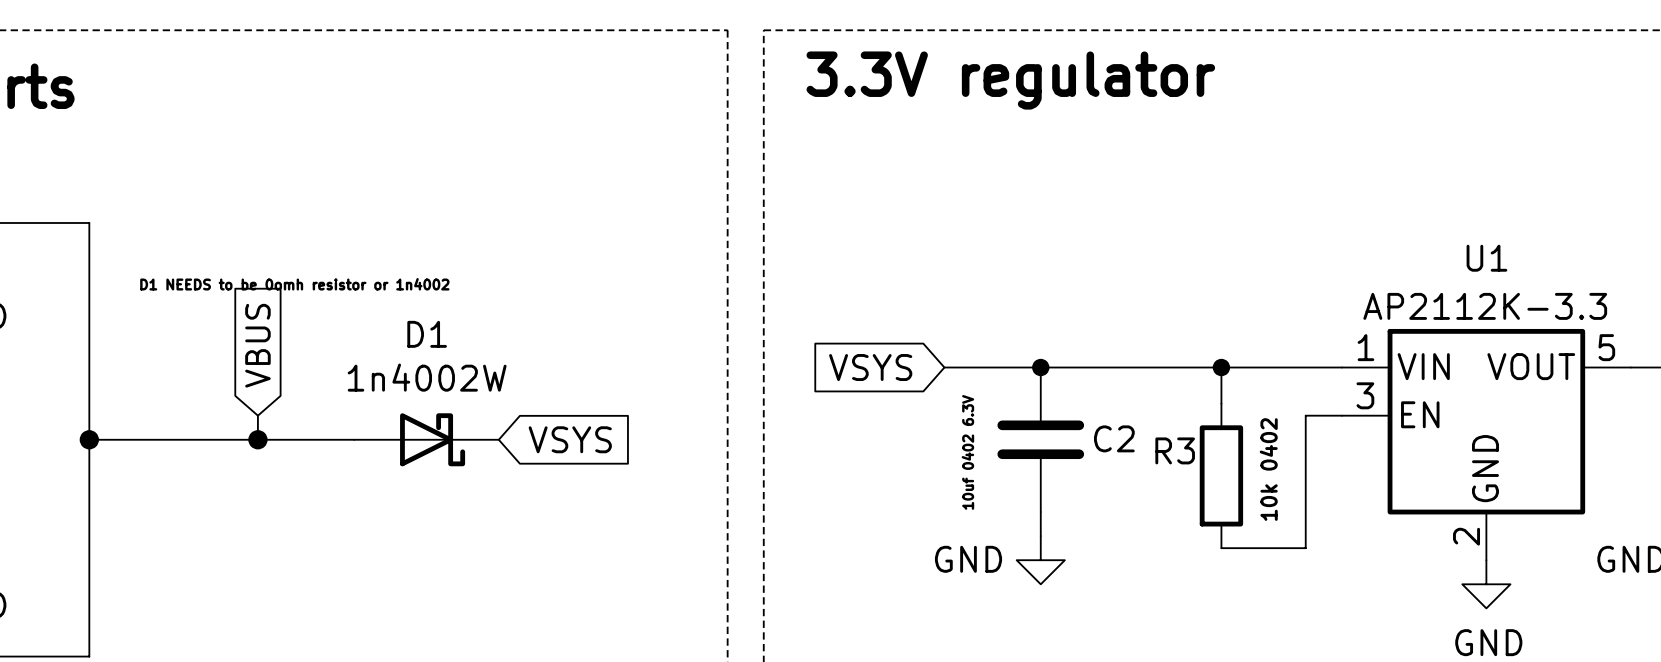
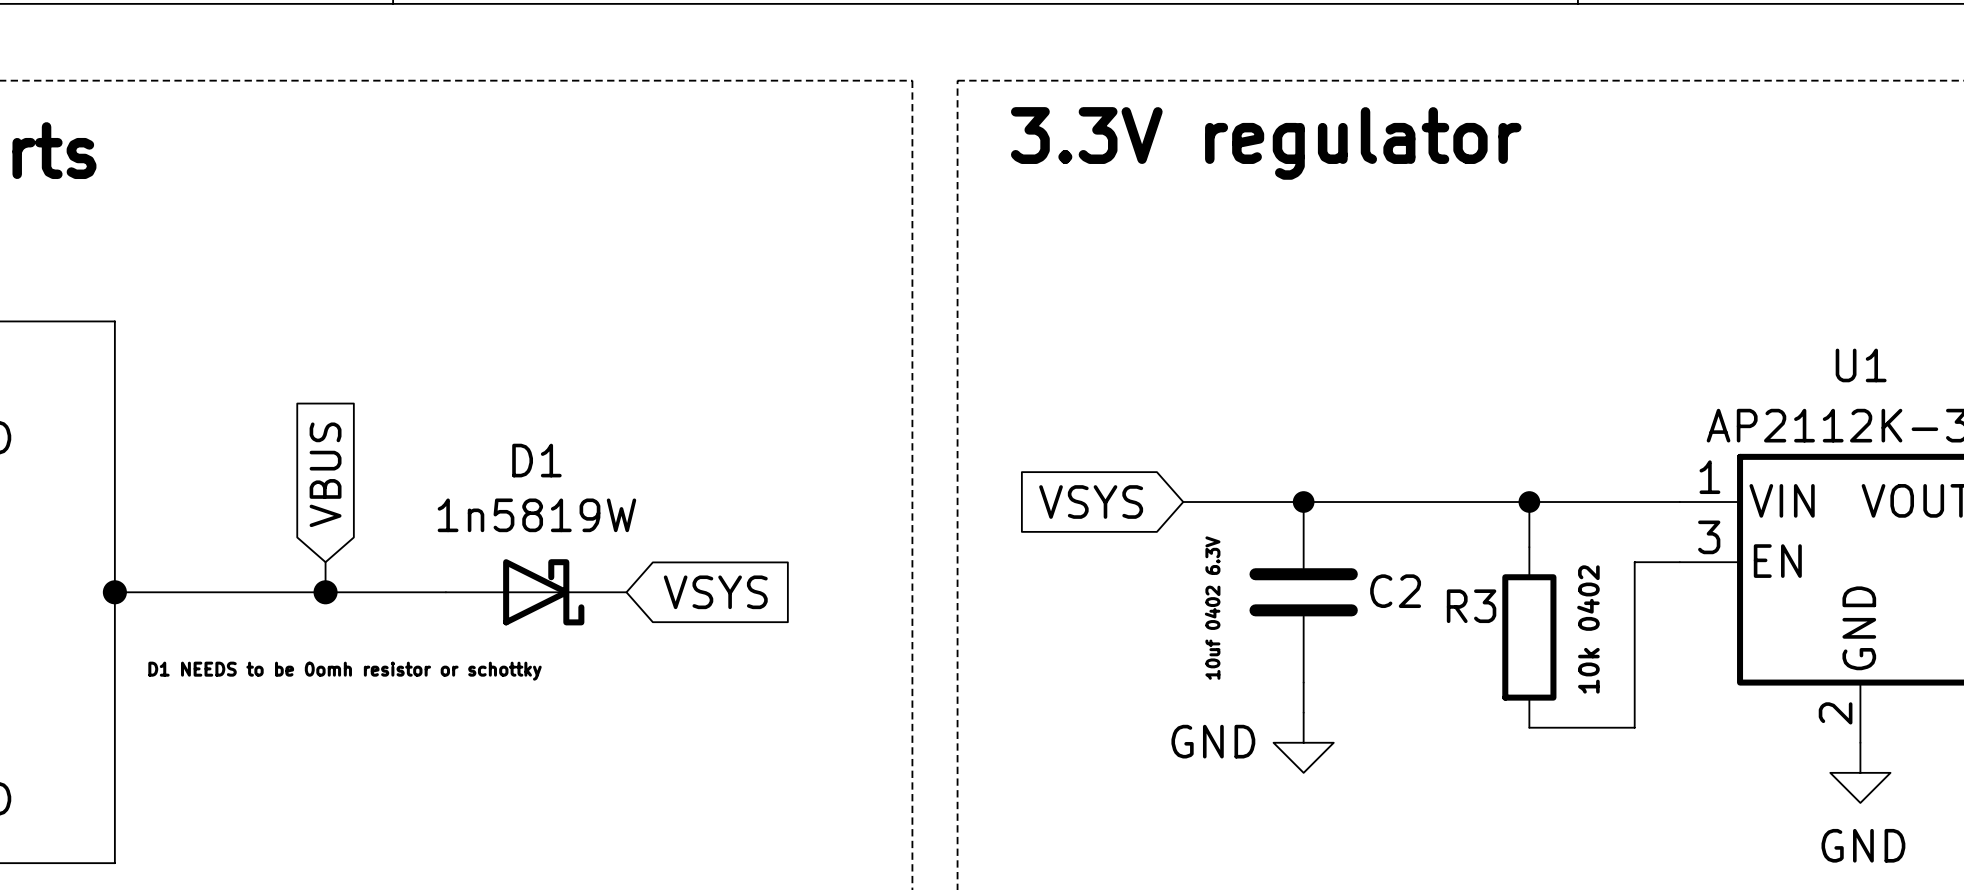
text: D1 NEEDS to be 0omh resistor or 1n4002 (294, 284) -> none
D1 value: 1n4002W (427, 377) -> 1n5819W (536, 515)
text: none -> D1 NEEDS to be 0omh resistor or schottky (345, 671)

